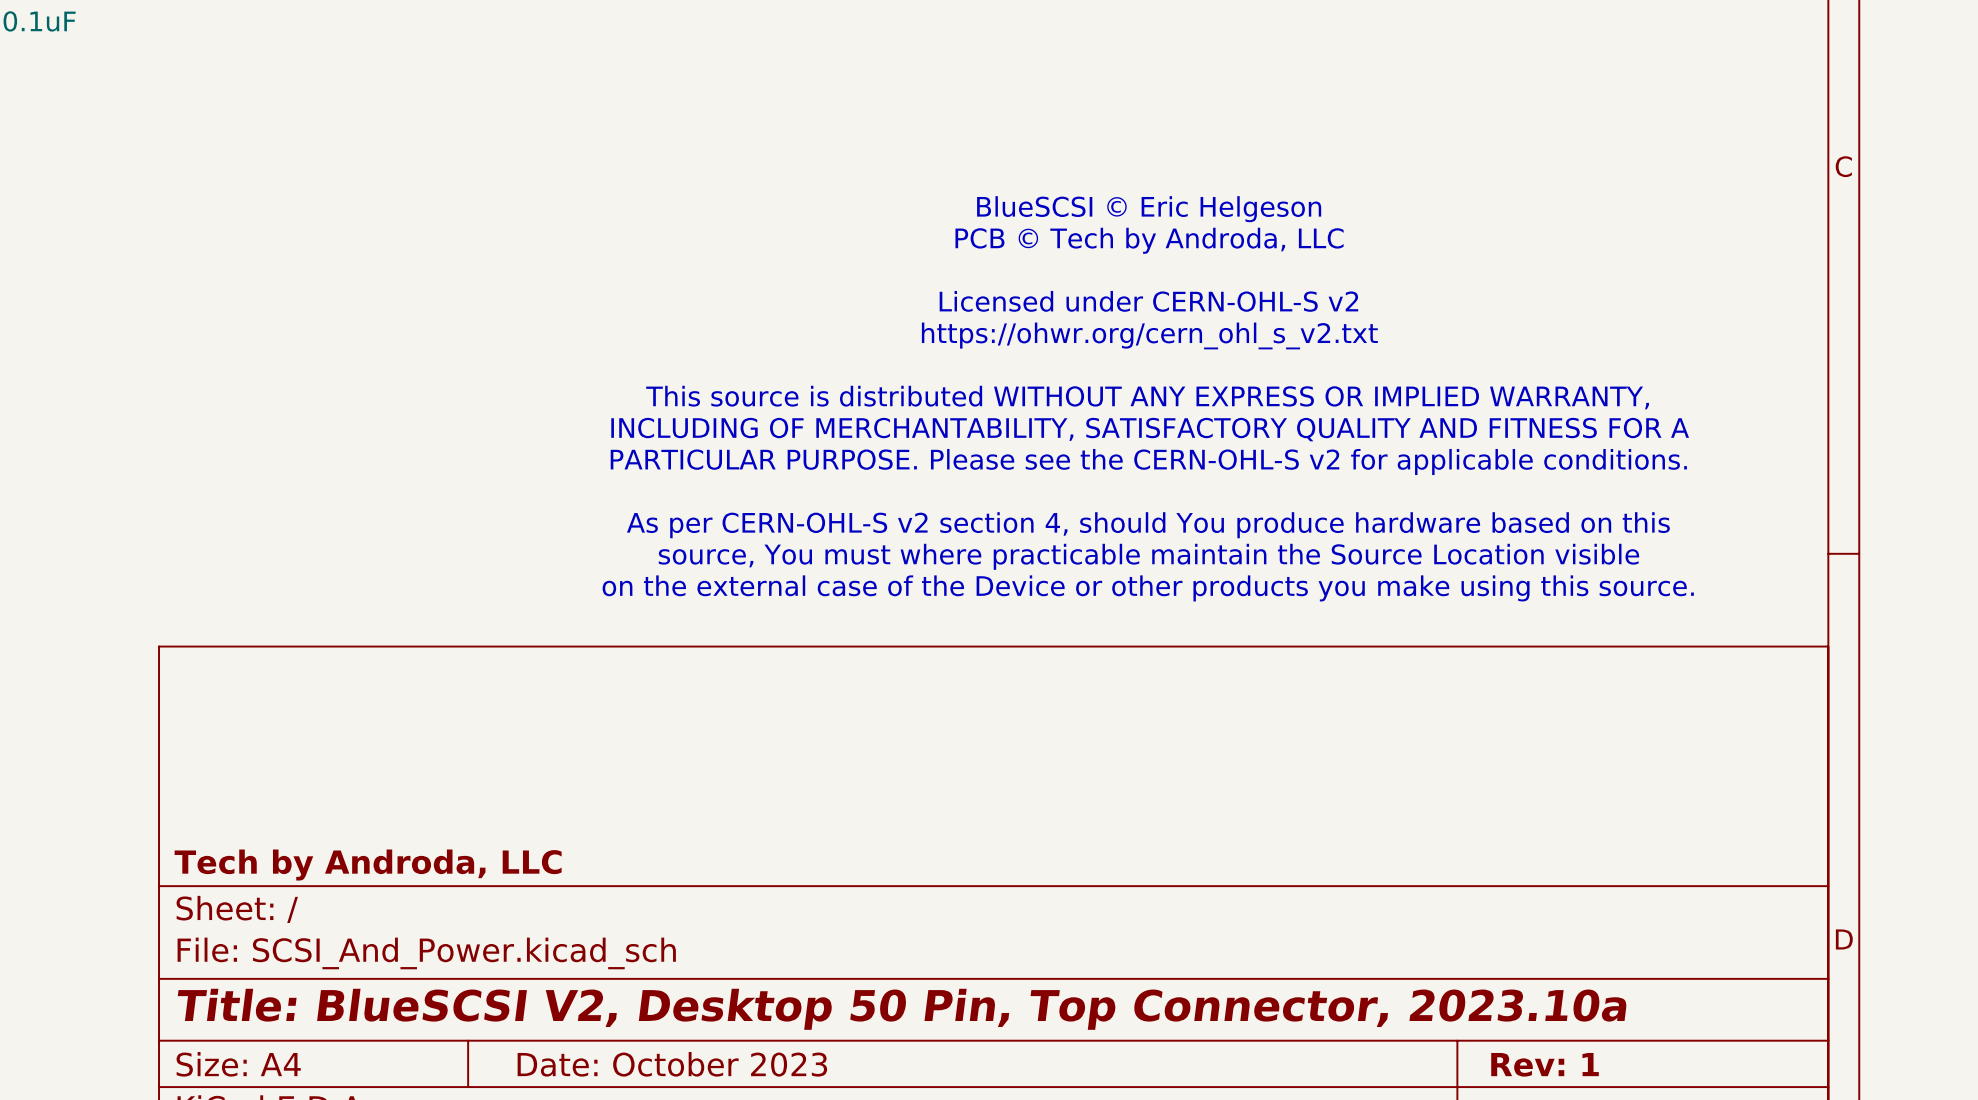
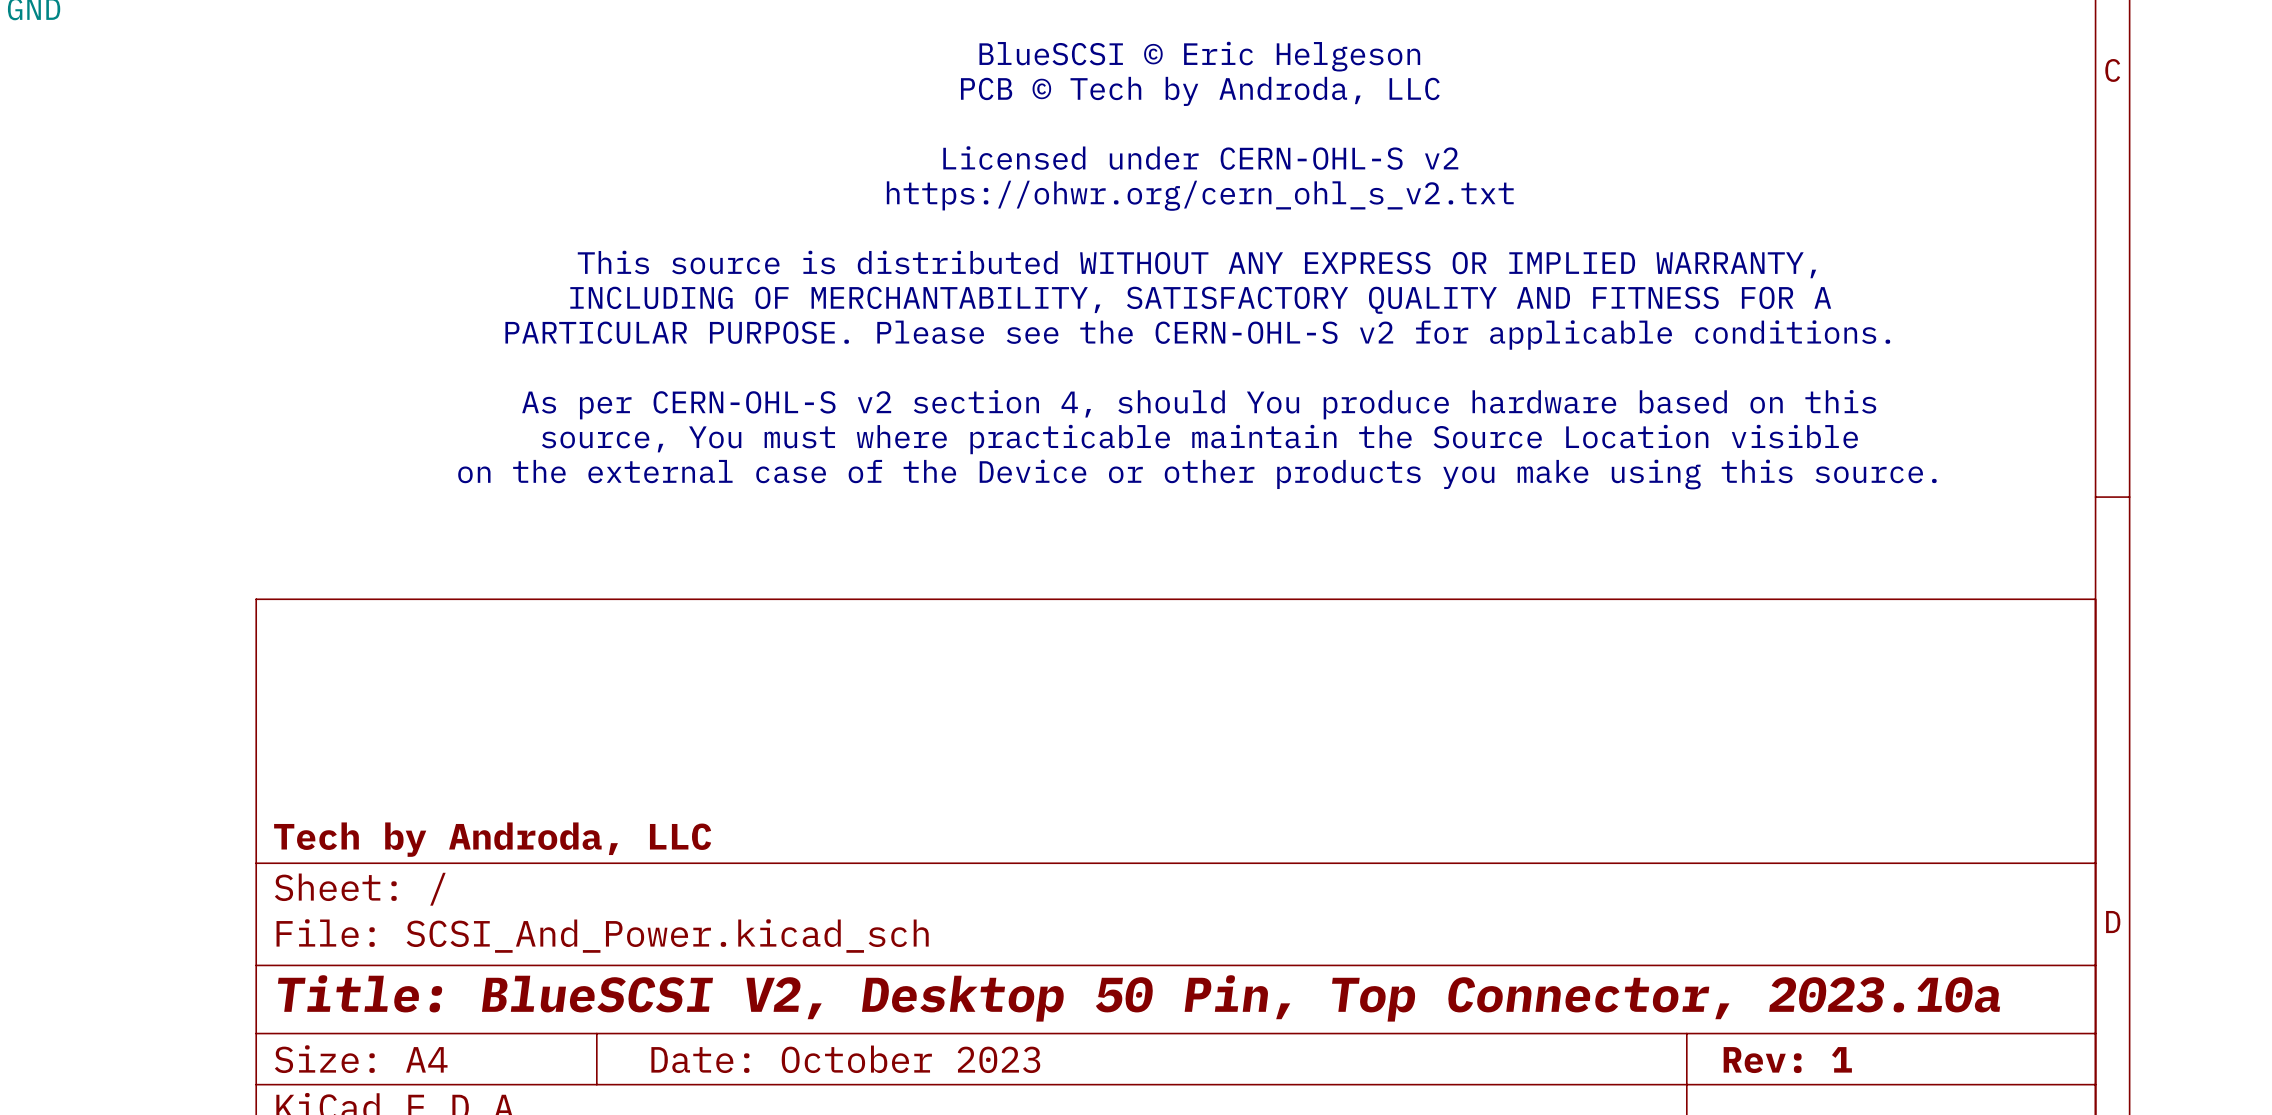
text position: BlueSCSI © Eric Helgeson (1149, 209) -> BlueSCSI © Eric Helgeson (1199, 56)
text position: PCB © Tech by Androda, LLC (1149, 240) -> PCB © Tech by Androda, LLC (1200, 91)
text position: Licensed under CERN-OHL-S v2 (1148, 301) -> Licensed under CERN-OHL-S v2 (1200, 158)
text position: https://ohwr.org/cern_ohl_s_v2.txt (1149, 335) -> https://ohwr.org/cern_ohl_s_v2.txt (1200, 195)
text position: This source is distributed WITHOUT ANY EXPRESS OR IMPLIED WARRANTY, (1147, 397) -> This source is distributed WITHOUT ANY EXPRESS OR IMPLIED WARRANTY, (1196, 264)
text position: INCLUDING OF MERCHANTABILITY, SATISFACTORY QUALITY AND FITNESS FOR A (1150, 429) -> INCLUDING OF MERCHANTABILITY, SATISFACTORY QUALITY AND FITNESS FOR A (1200, 300)
text position: PARTICULAR PURPOSE. Please see the CERN-OHL-S v2 for applicable conditions. (1148, 462) -> PARTICULAR PURPOSE. Please see the CERN-OHL-S v2 for applicable conditions. (1197, 335)
text position: As per CERN-OHL-S v2 section 4, should You produce hardware based on this (1148, 525) -> As per CERN-OHL-S v2 section 4, should You produce hardware based on this (1199, 404)
text position: source, You must where practicable maintain the Source Location visible (1148, 556) -> source, You must where practicable maintain the Source Location visible (1199, 439)
text position: on the external case of the Device or other products you make using this source. (1148, 588) -> on the external case of the Device or other products you make using this source. (1197, 474)

